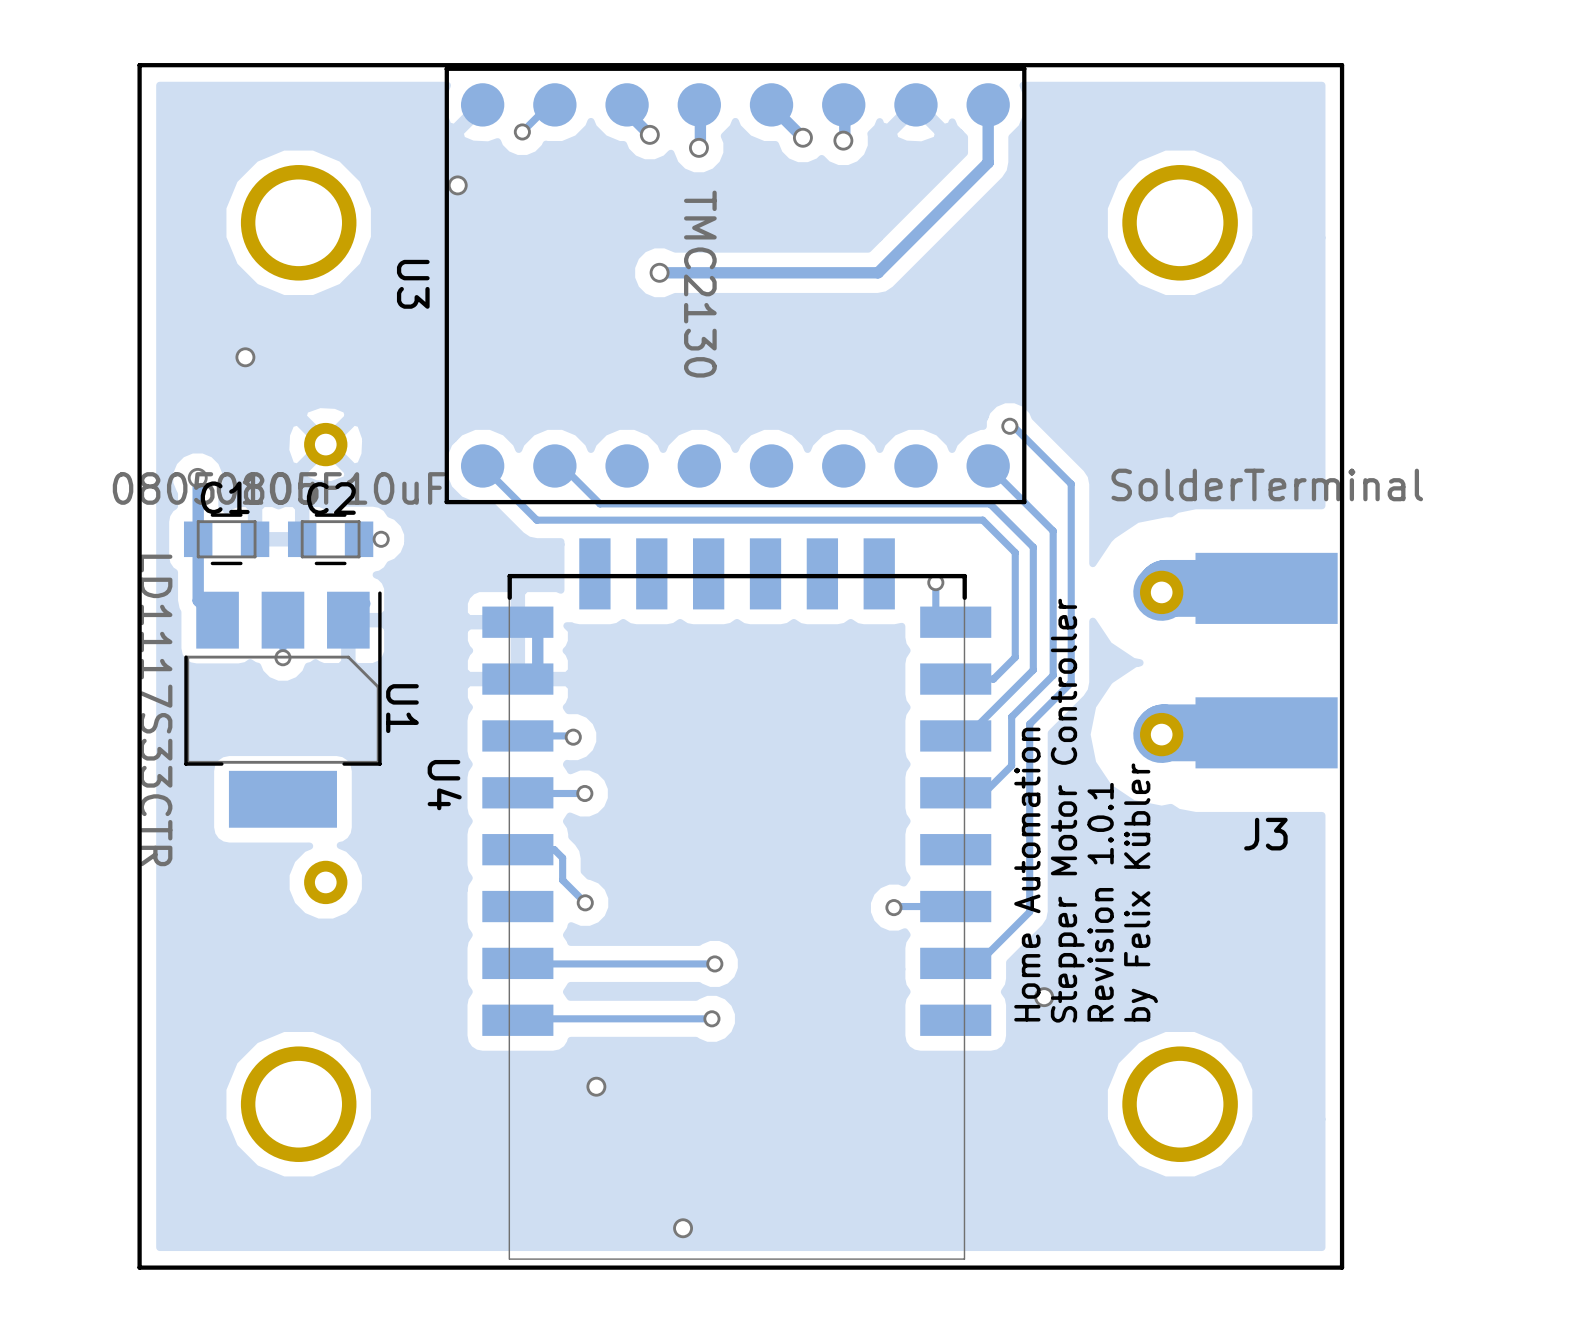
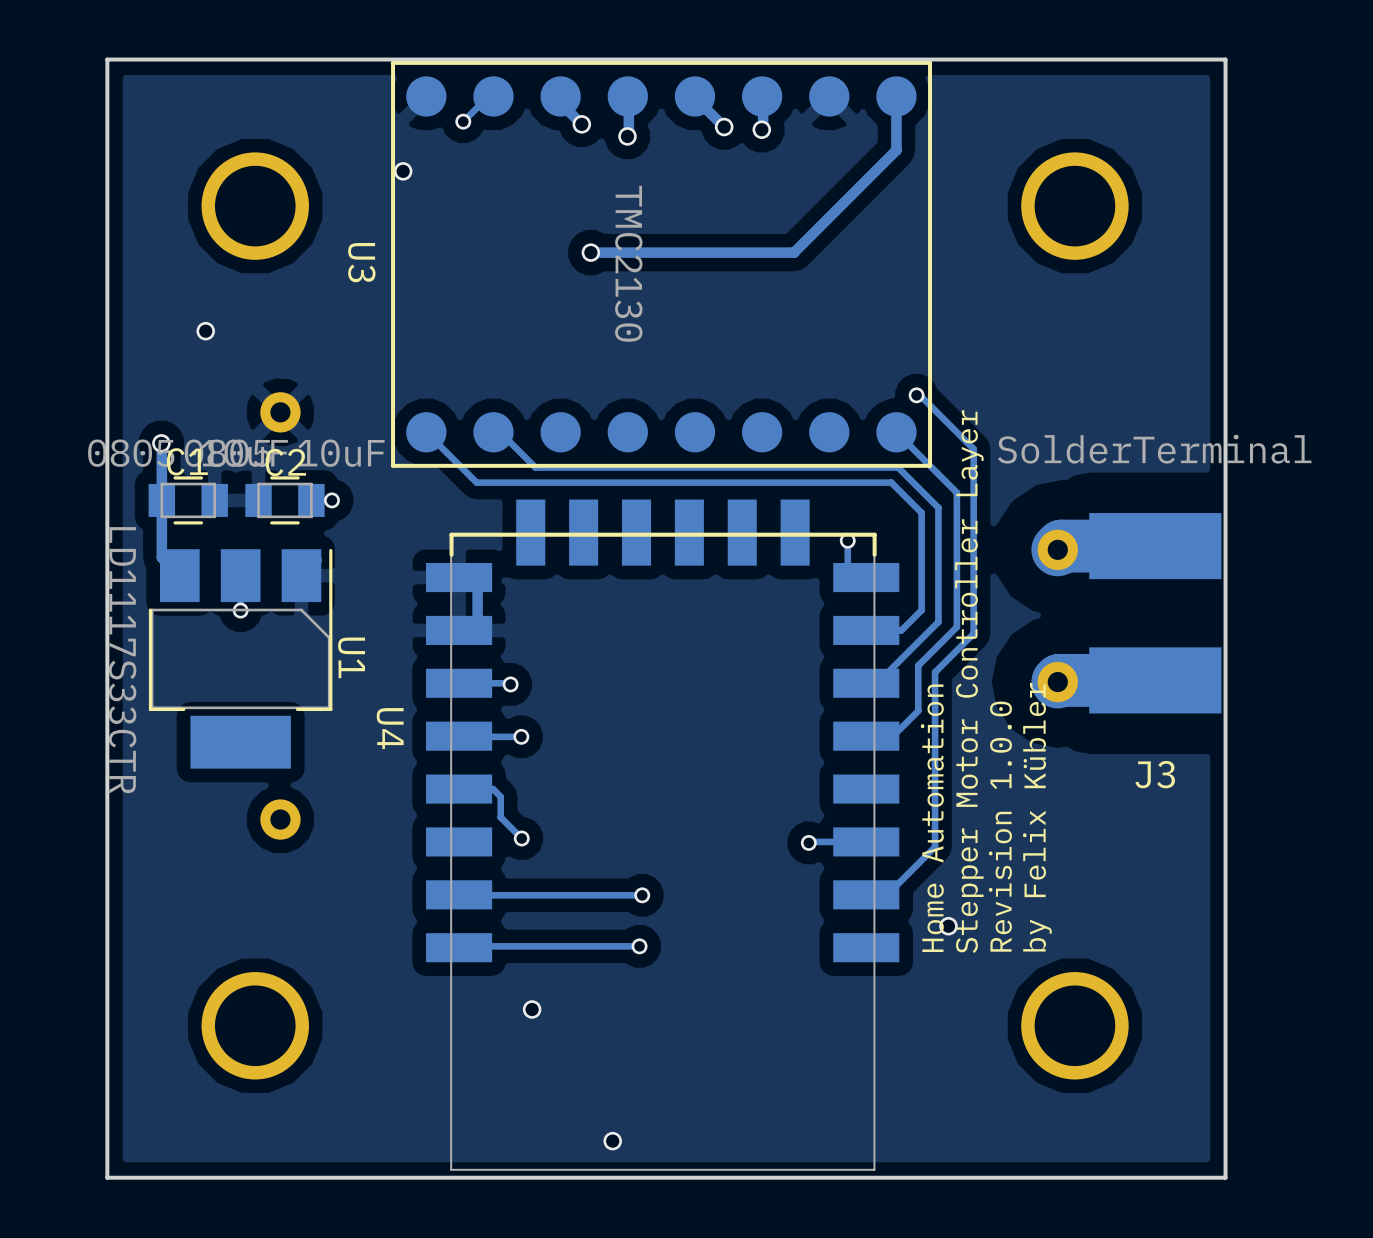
text: Stepper Motor Controller (1067, 810) -> Stepper Motor Controller Layer (969, 681)
text: Revision 1.0.1 (1100, 902) -> Revision 1.0.0 (1000, 826)

